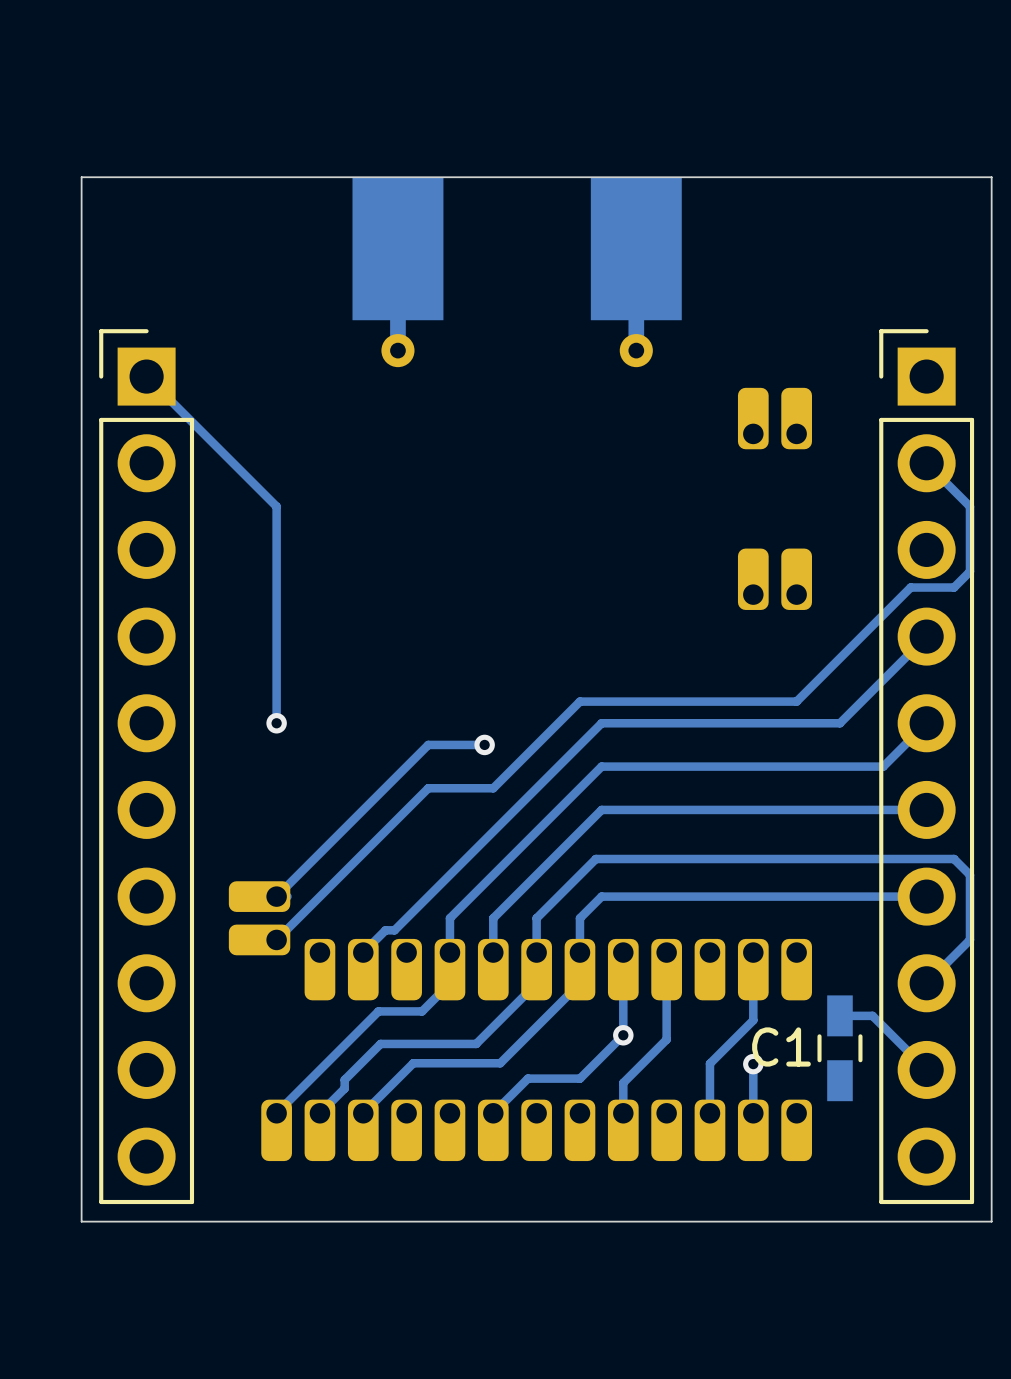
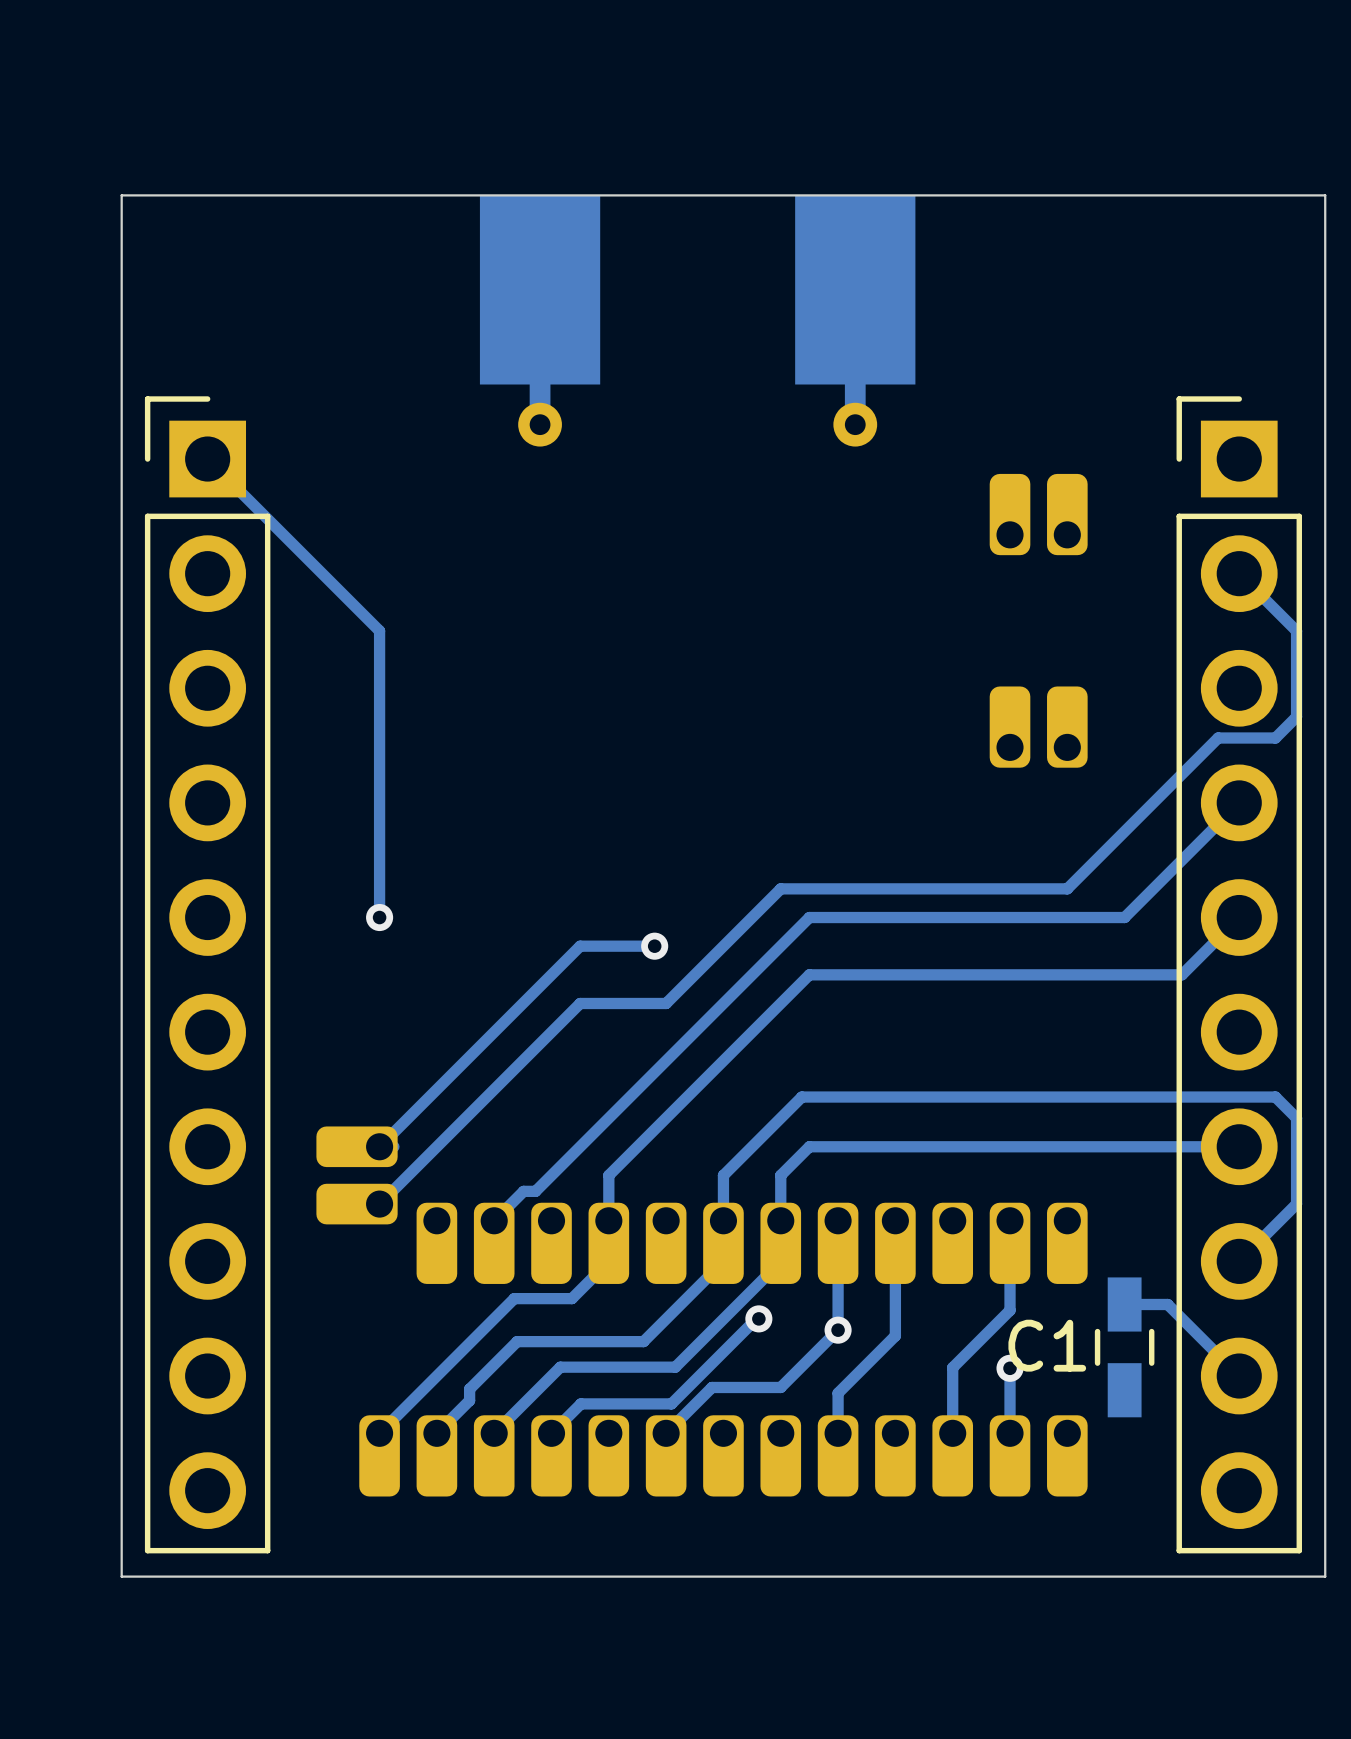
track: (926, 809) (601, 809) (493, 918) (493, 952) -> none
track: none -> (756, 1318) (671, 1403) (580, 1403) (551, 1433)
via: none -> (758, 1318)

